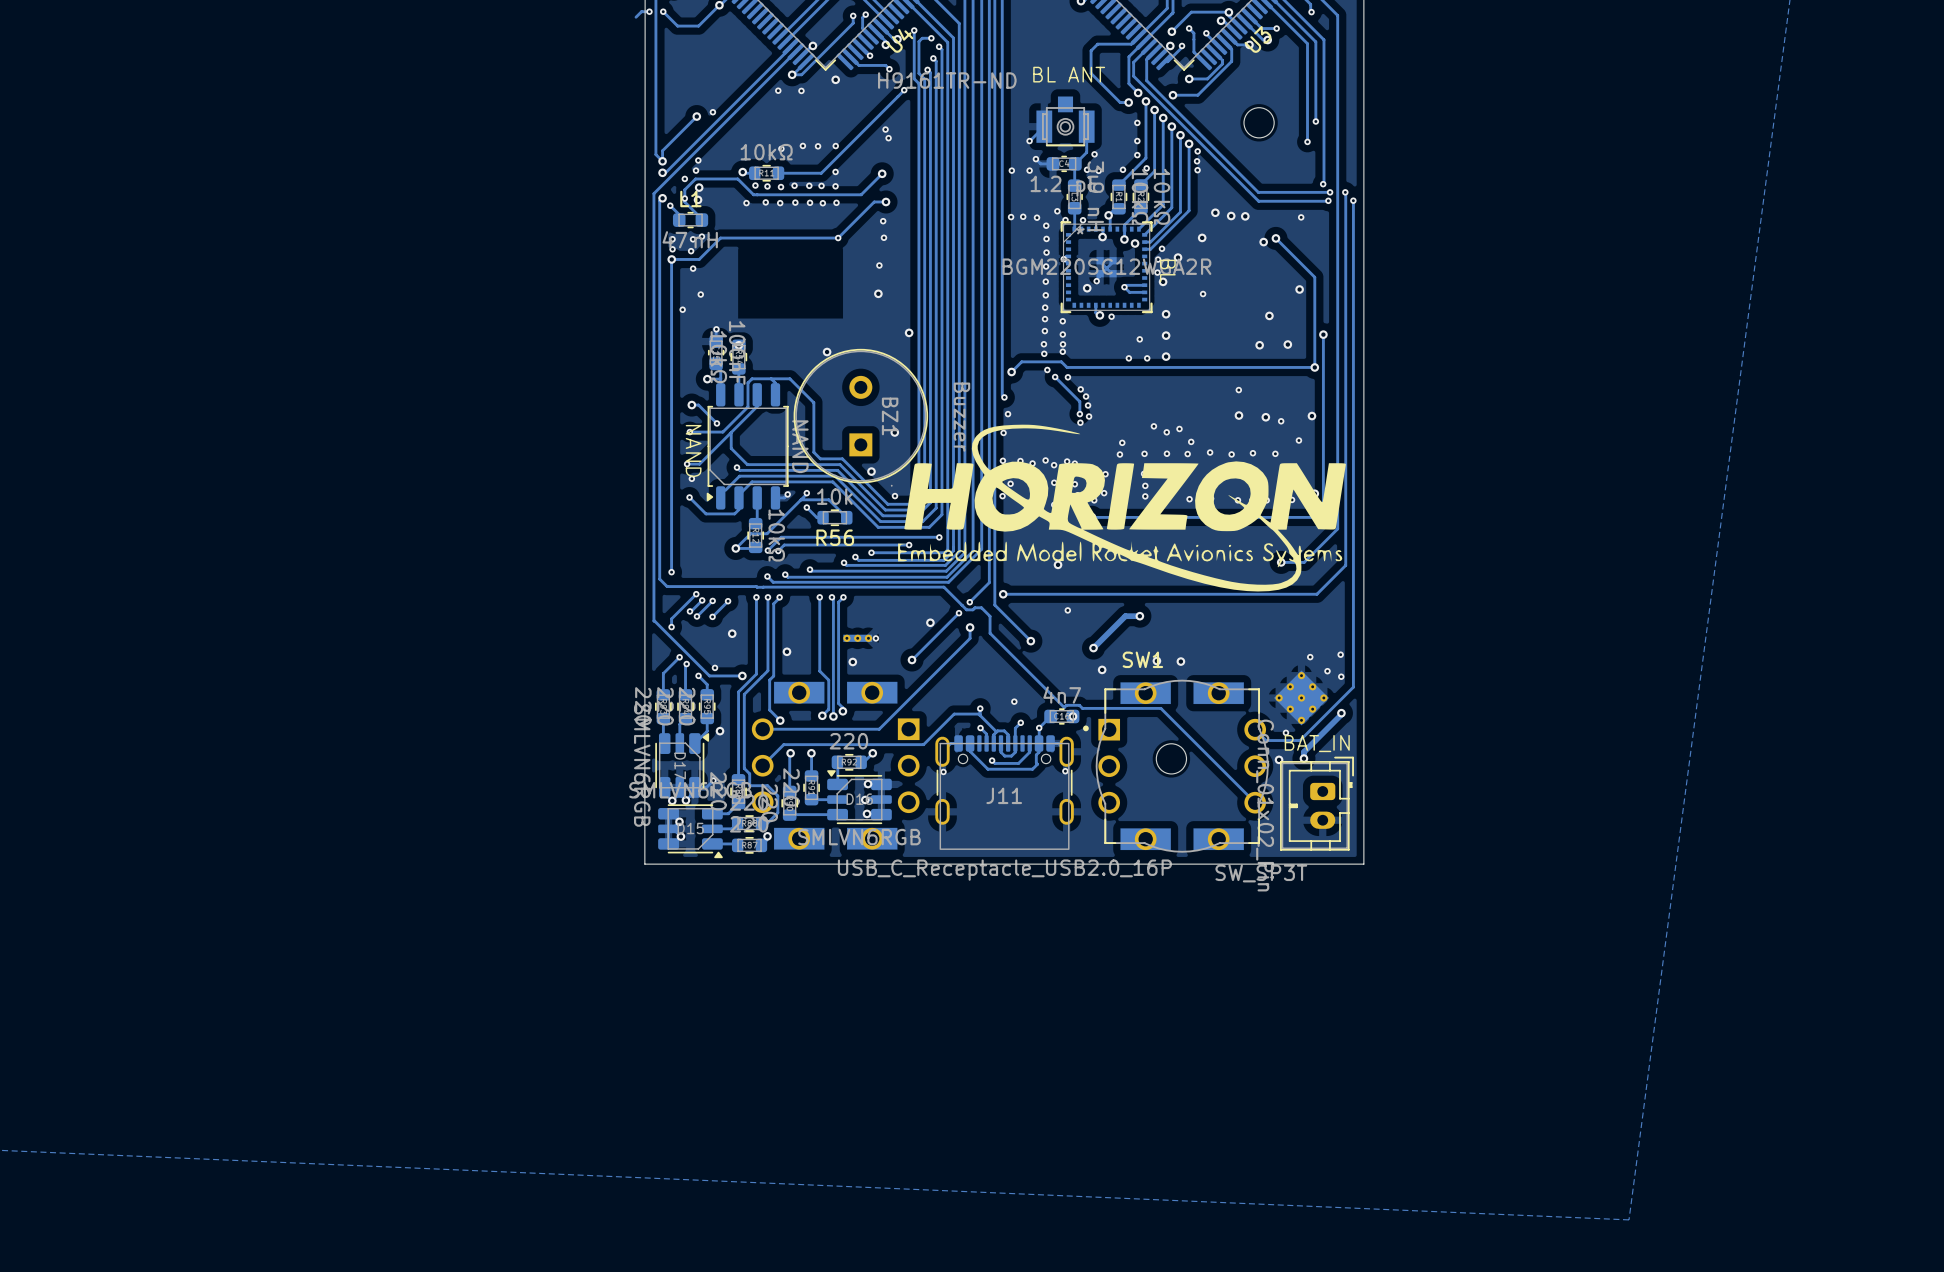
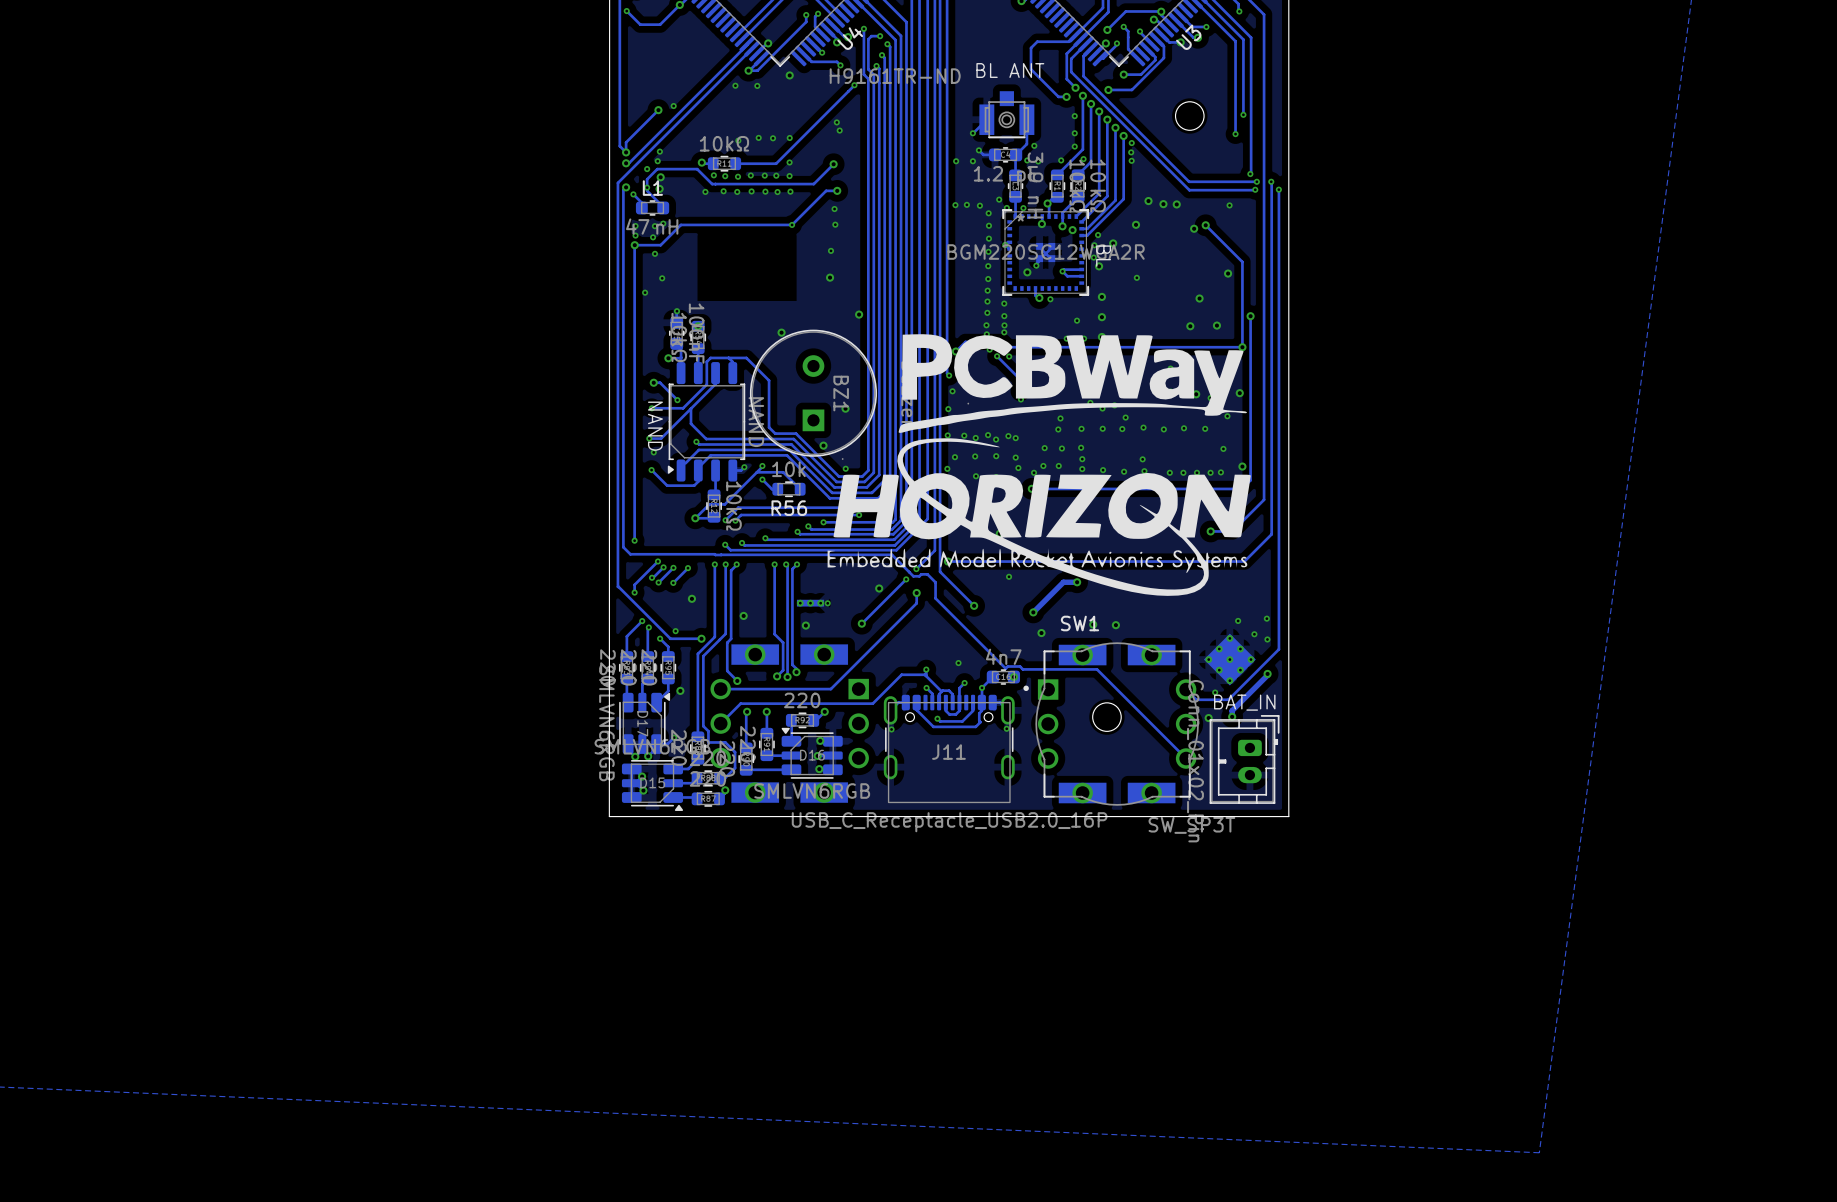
track: (649, 11) (641, 11) (636, 17) -> none
via: (649, 11) -> none
drawing: none -> [898, 334, 1248, 433]
drawing position: (1121, 508) -> (1039, 517)

